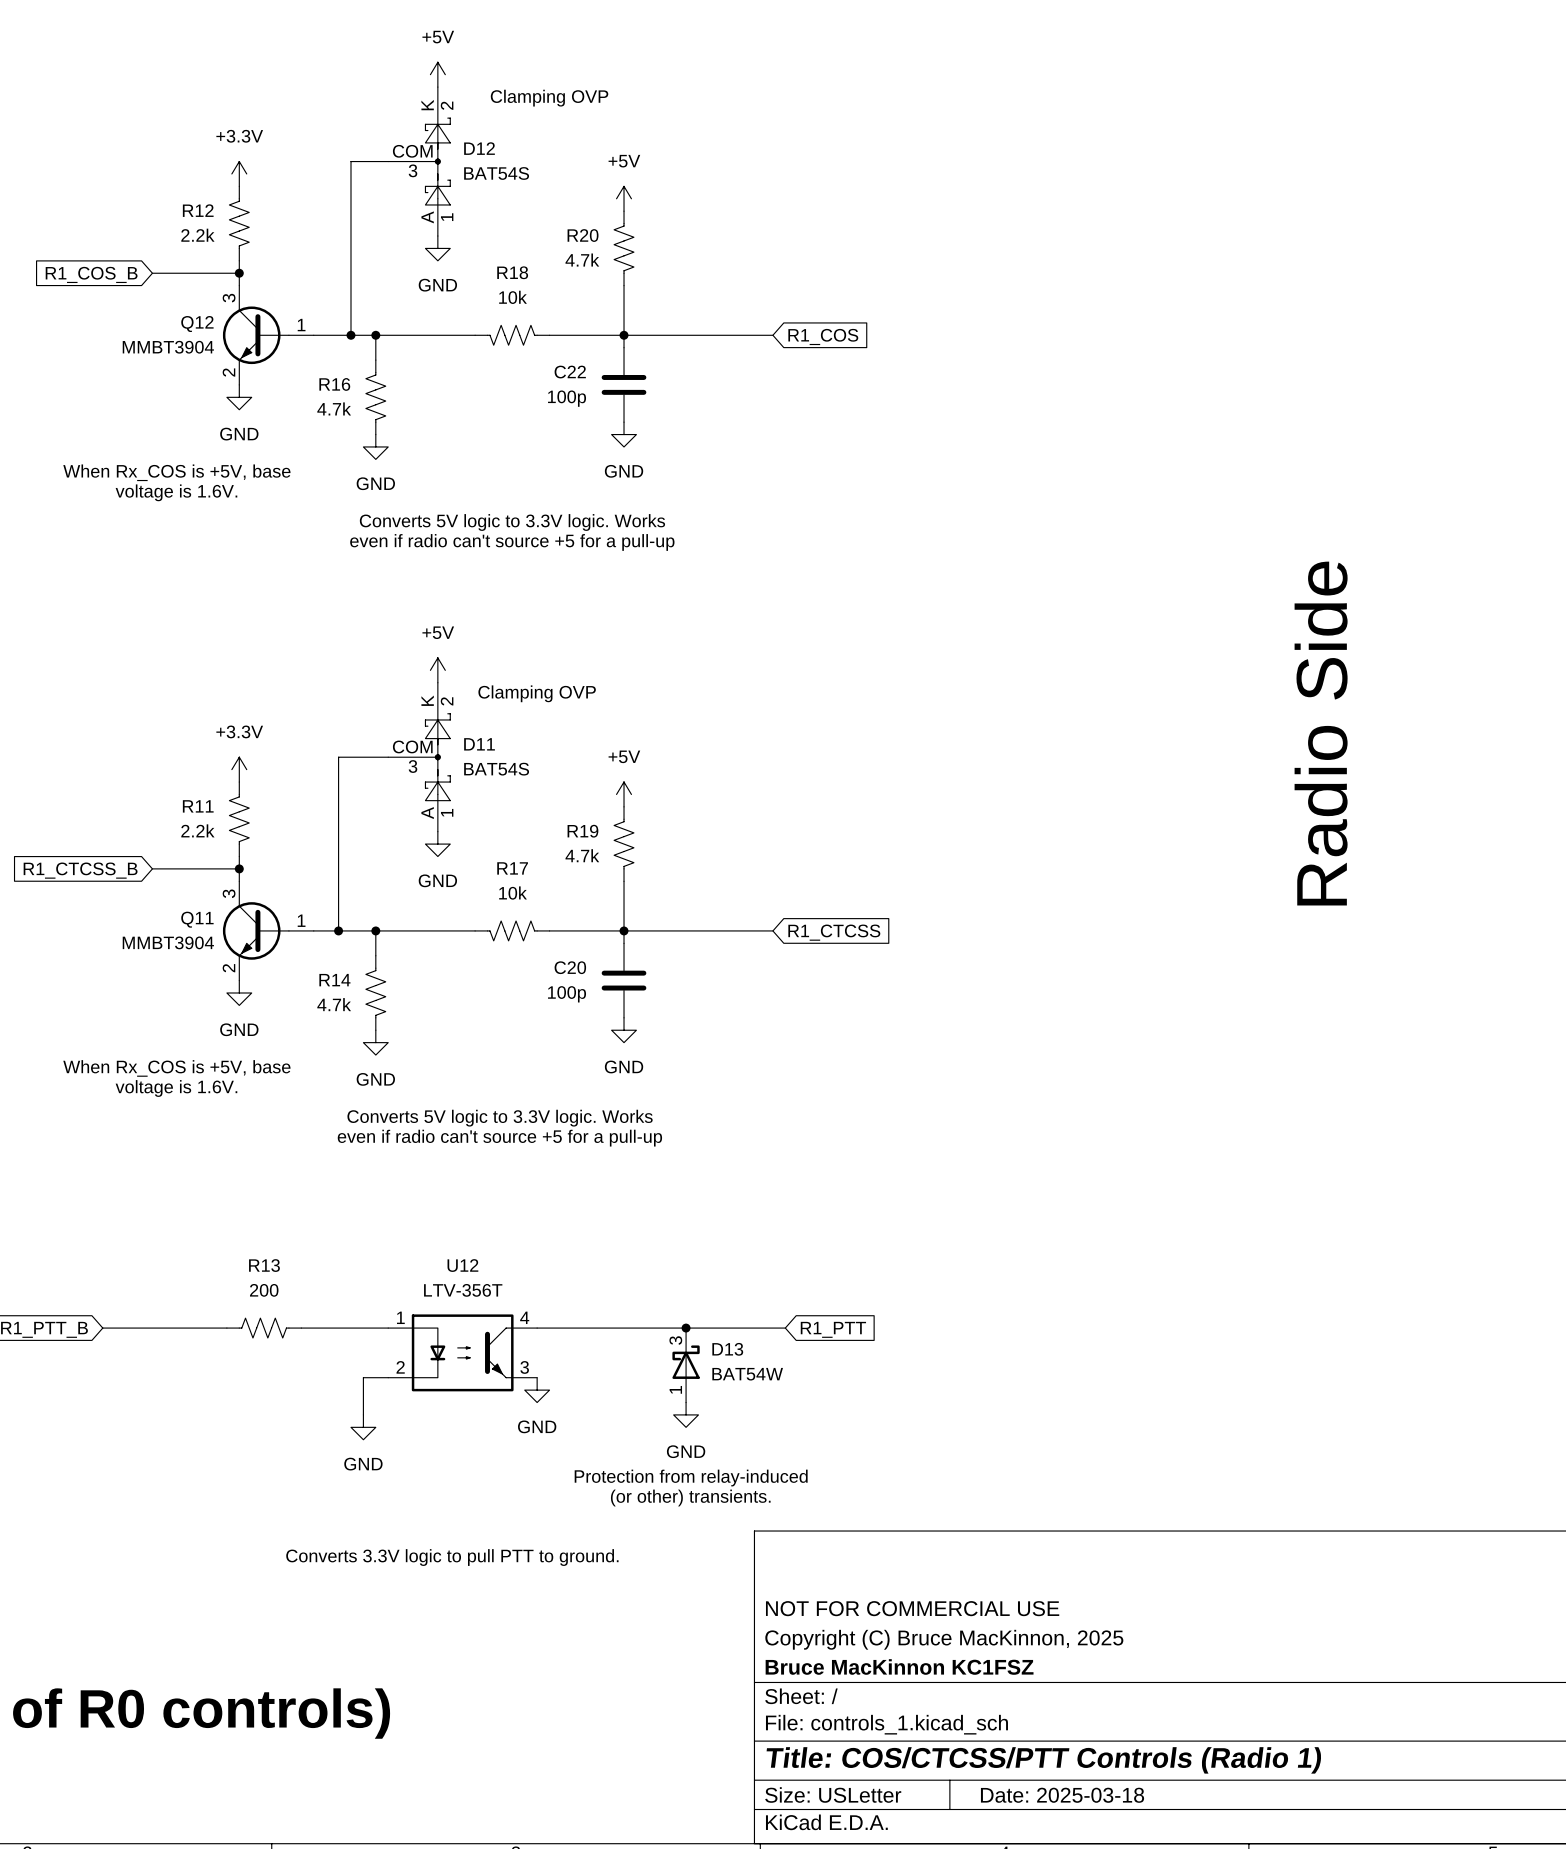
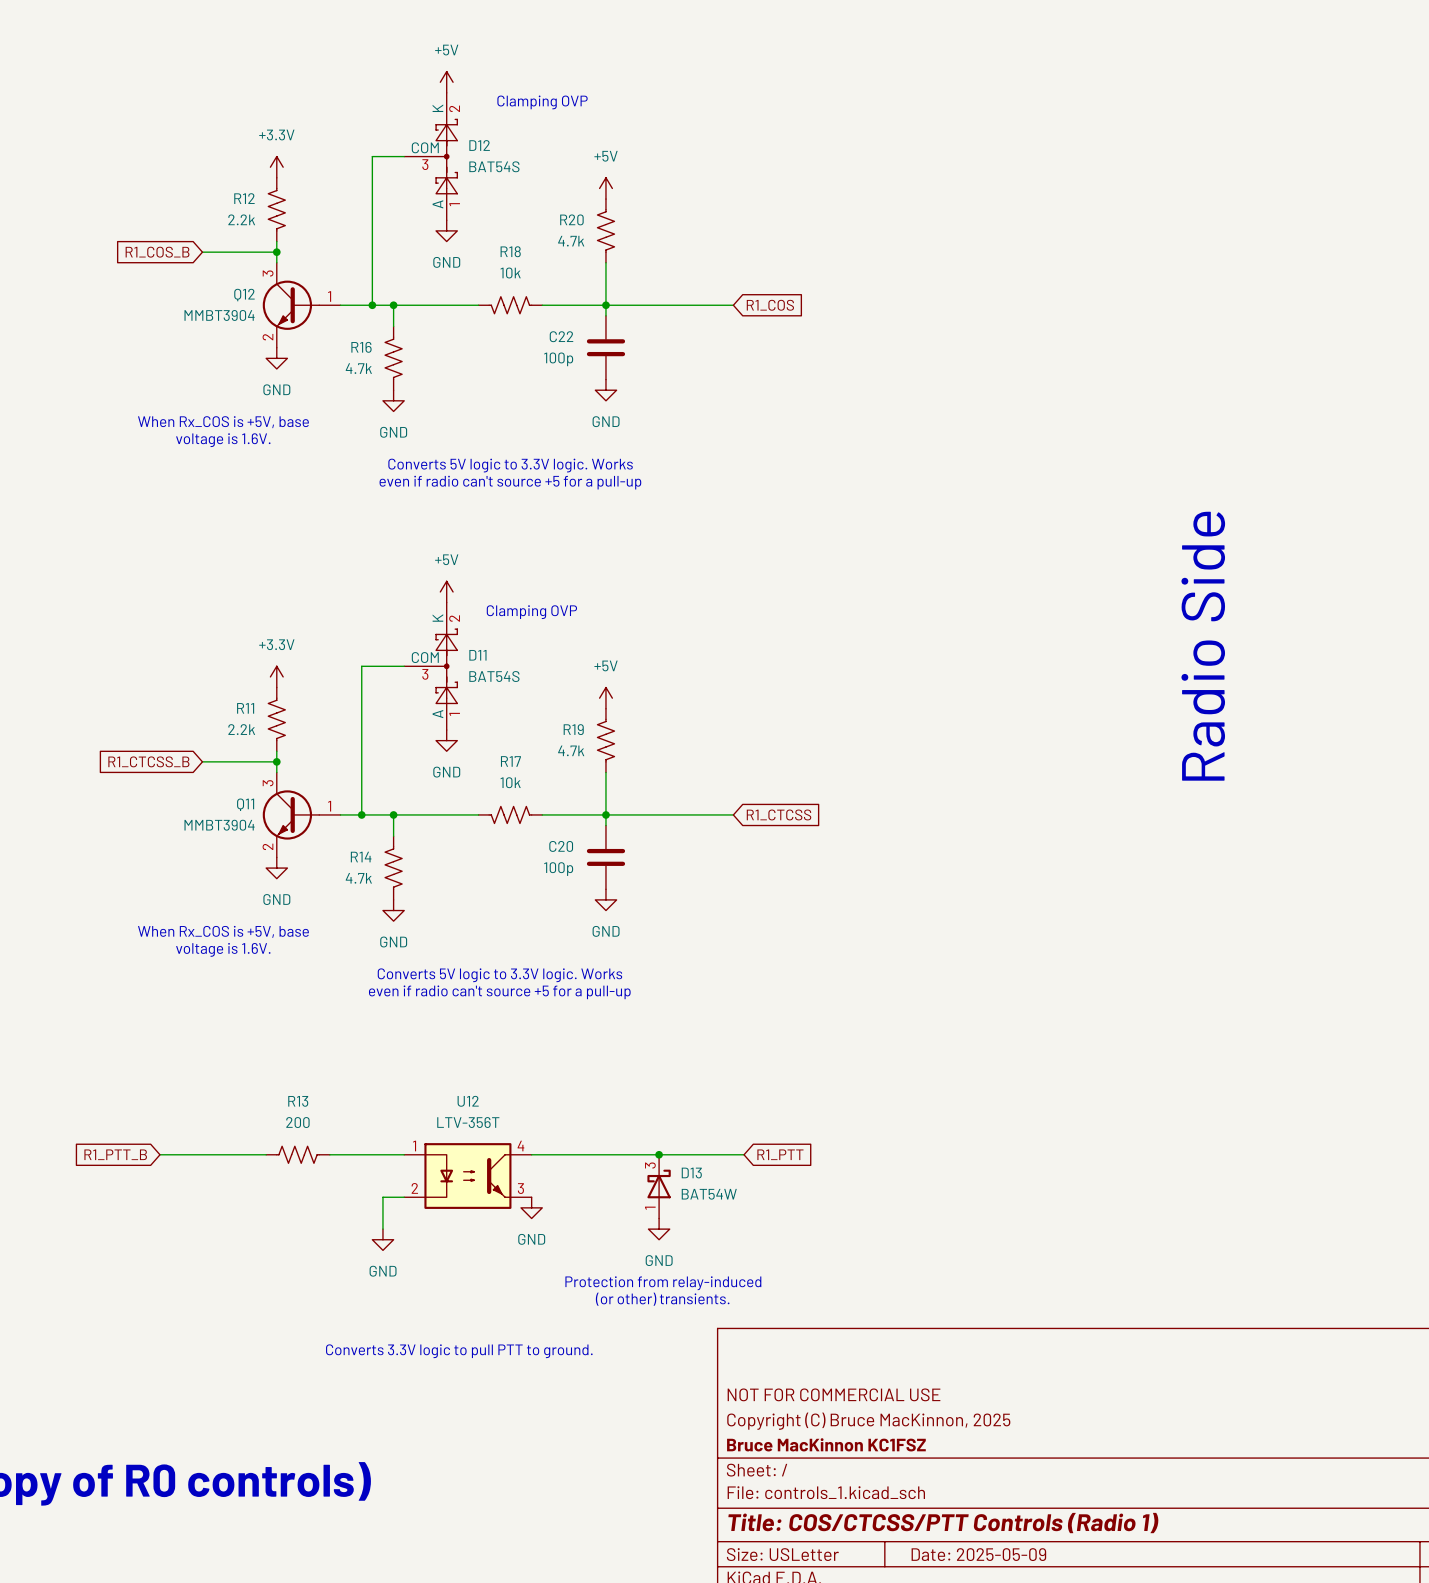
title block: Date: 2025-03-18 (1062, 1795) -> Date: 2025-05-09 (978, 1554)

